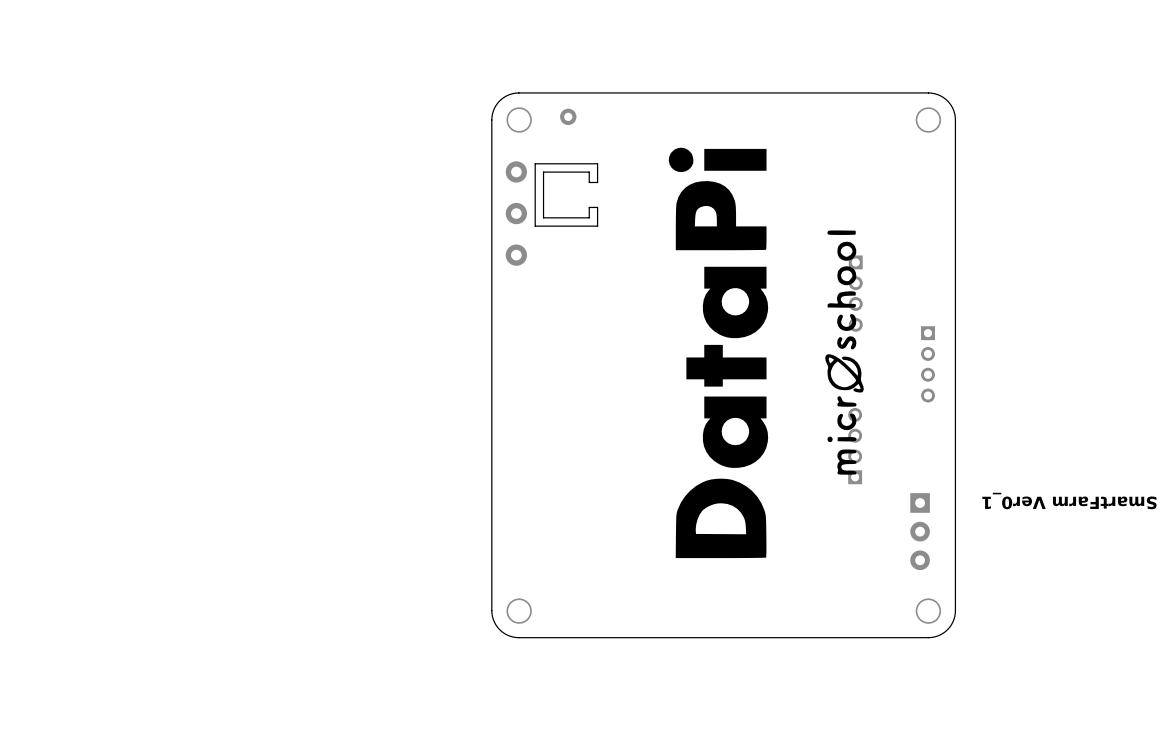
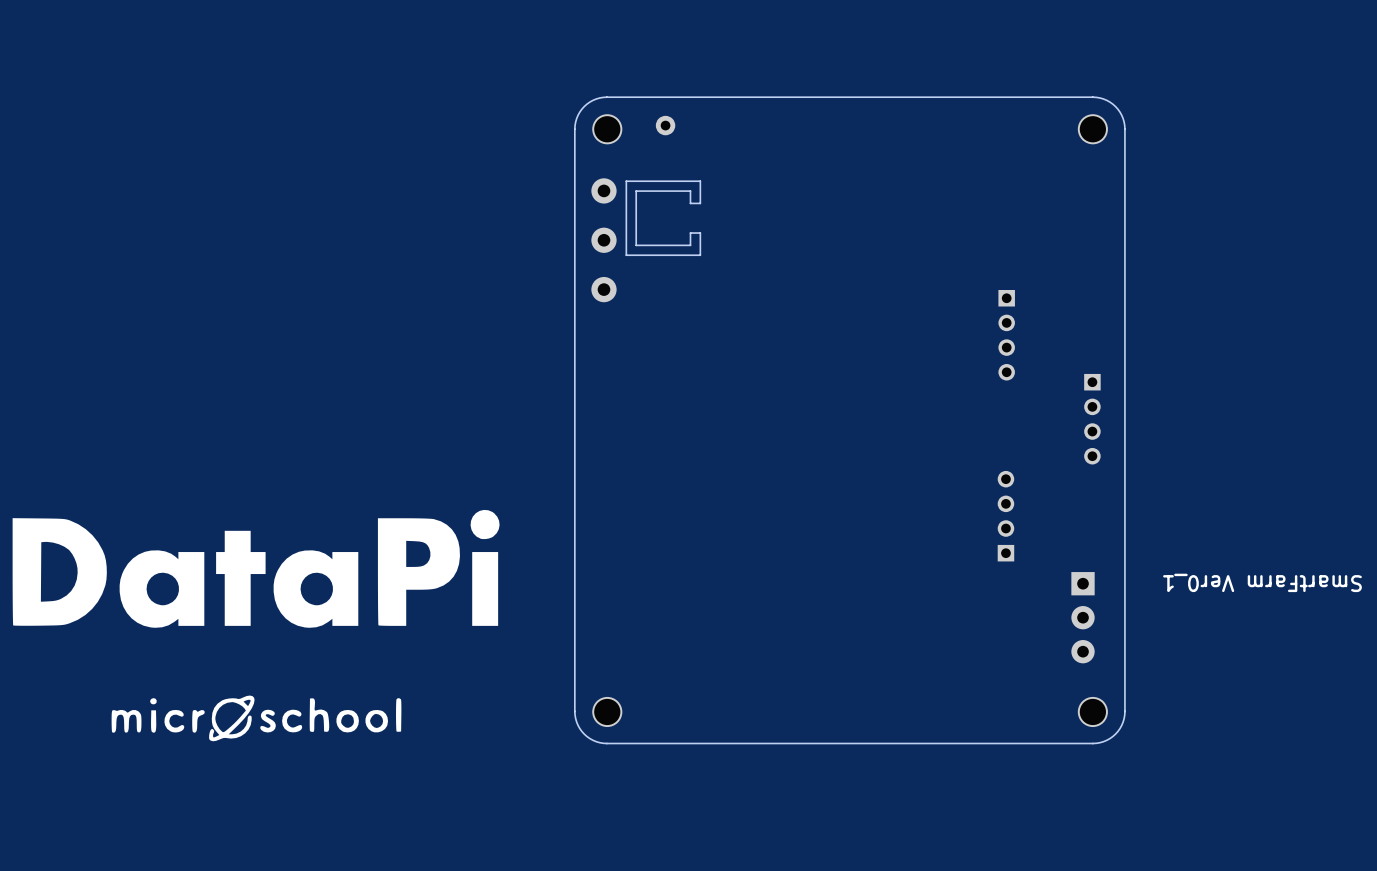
drawing: [668, 147, 864, 559] -> none
drawing: none -> [12, 509, 500, 742]

